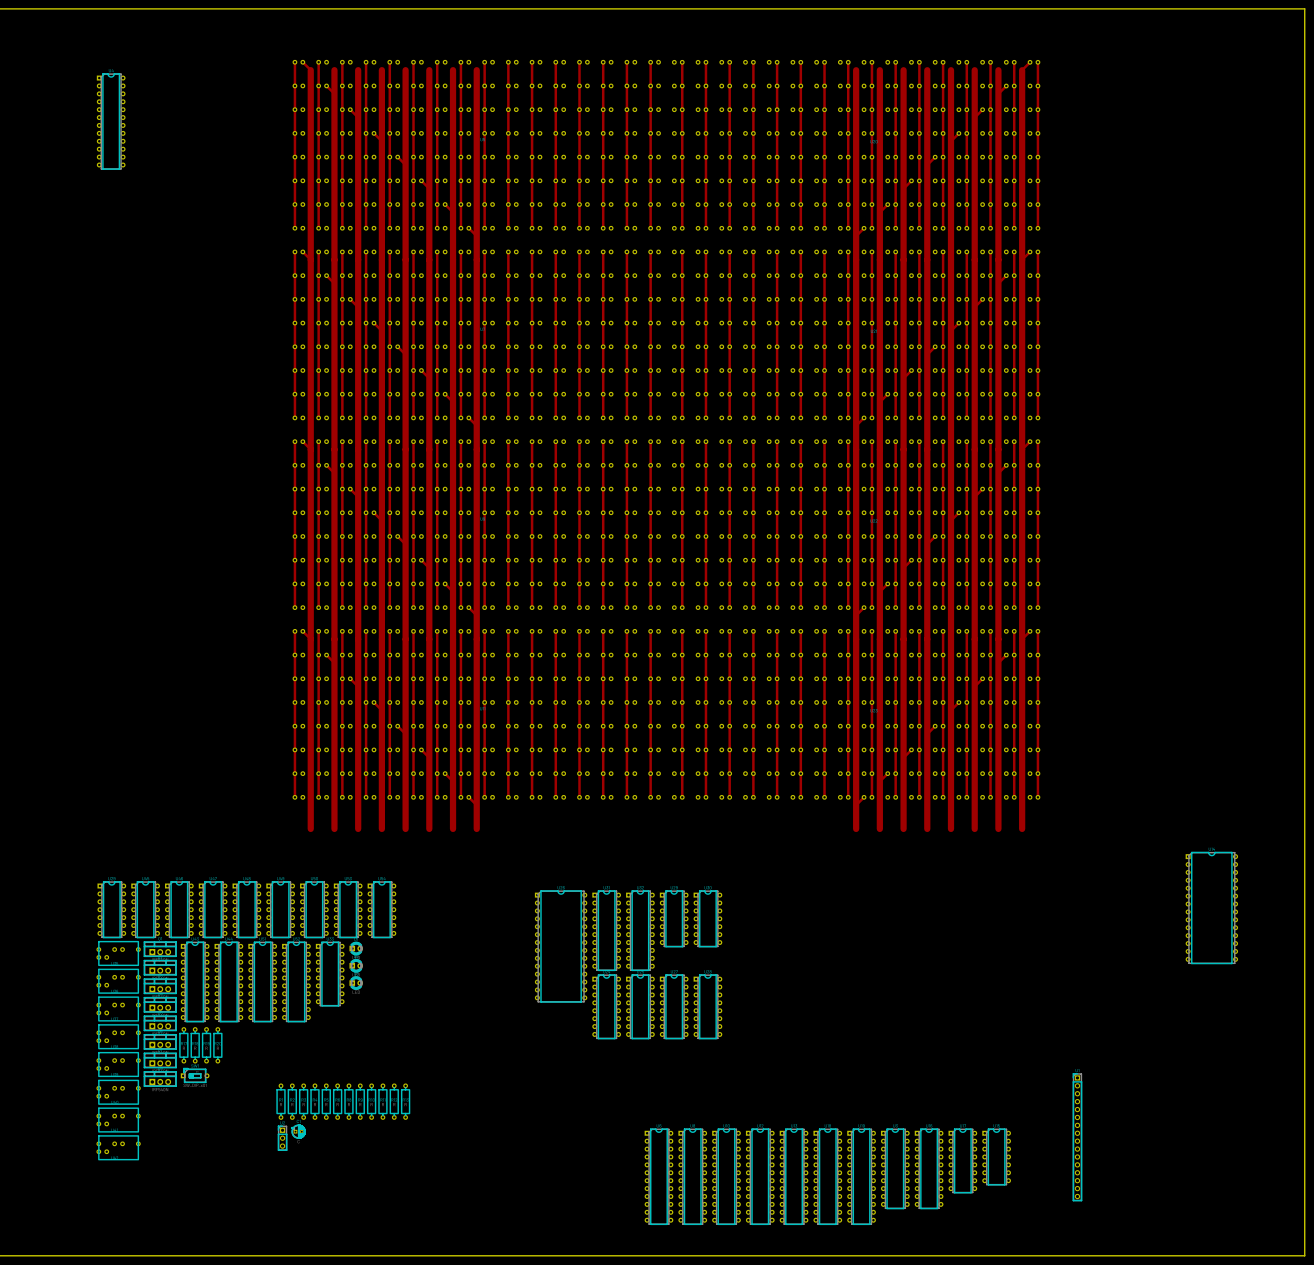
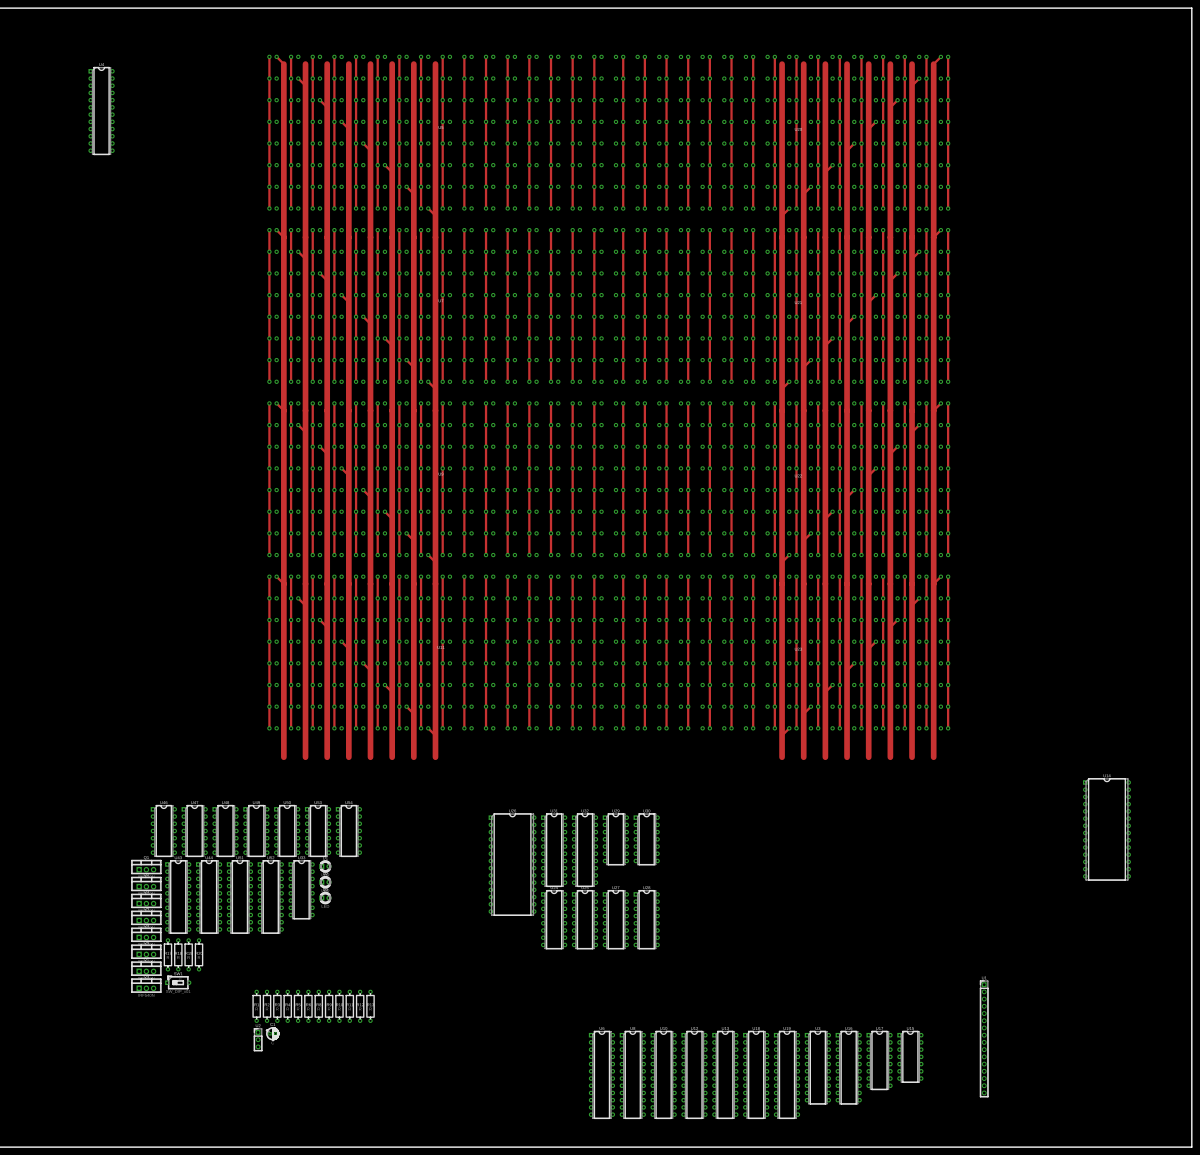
part: (111, 909) -> none
part: (145, 909) -> none
part: (118, 953) -> none
part: (118, 981) -> none
part: (118, 1008) -> none
part: (118, 1036) -> none
part: (118, 1064) -> none
part: (118, 1092) -> none
part: (118, 1120) -> none
part: (118, 1147) -> none

